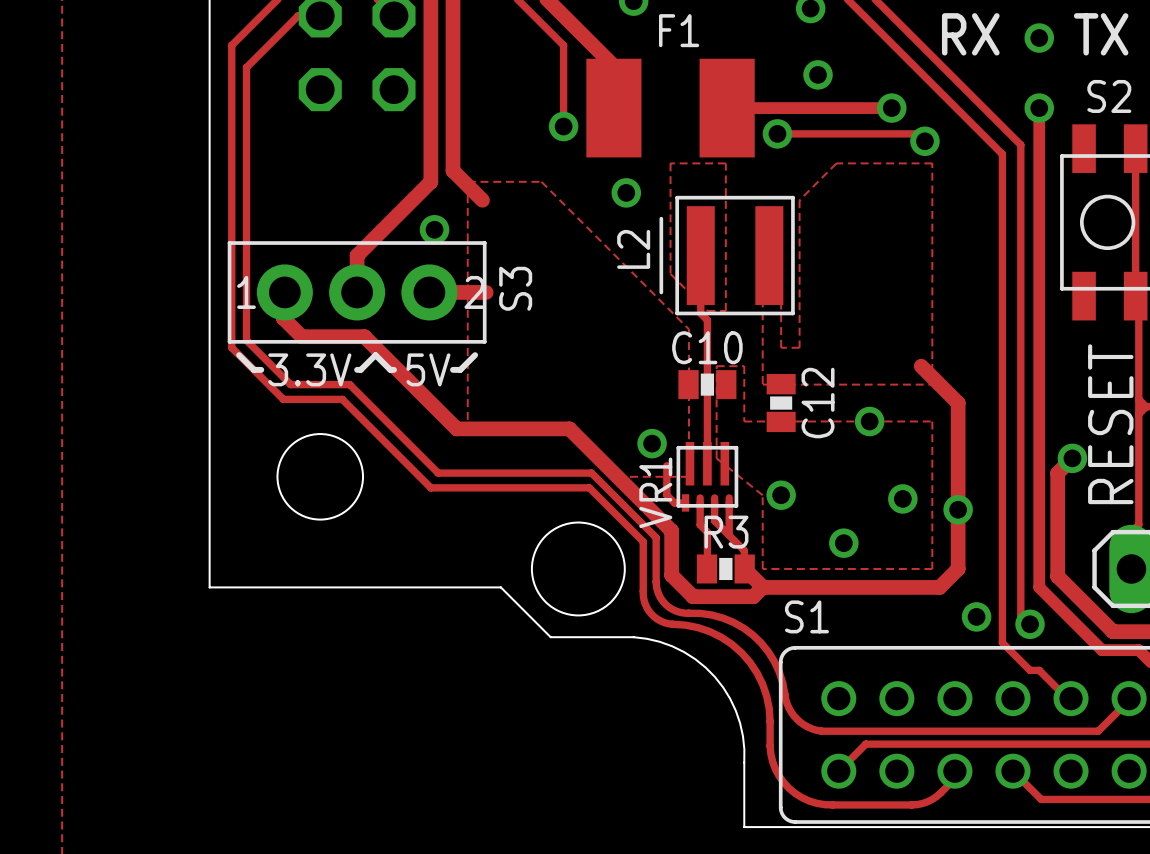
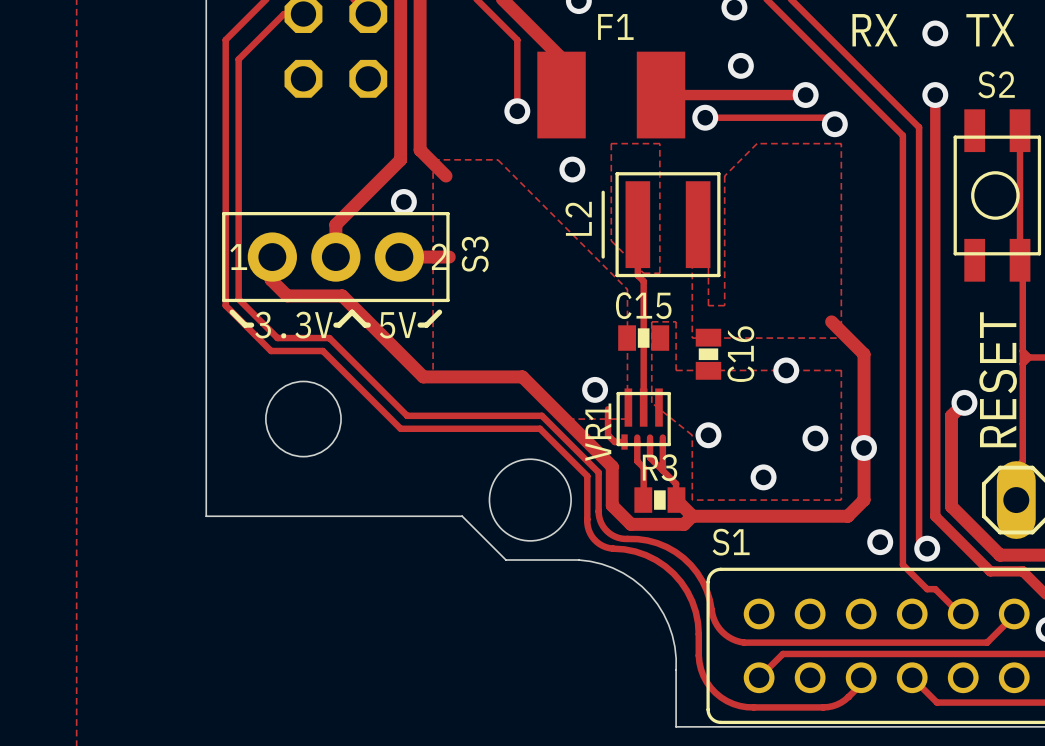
C10 name: C10 (707, 347) -> C15 (643, 305)
C12 name: C12 (818, 403) -> C16 (740, 354)

